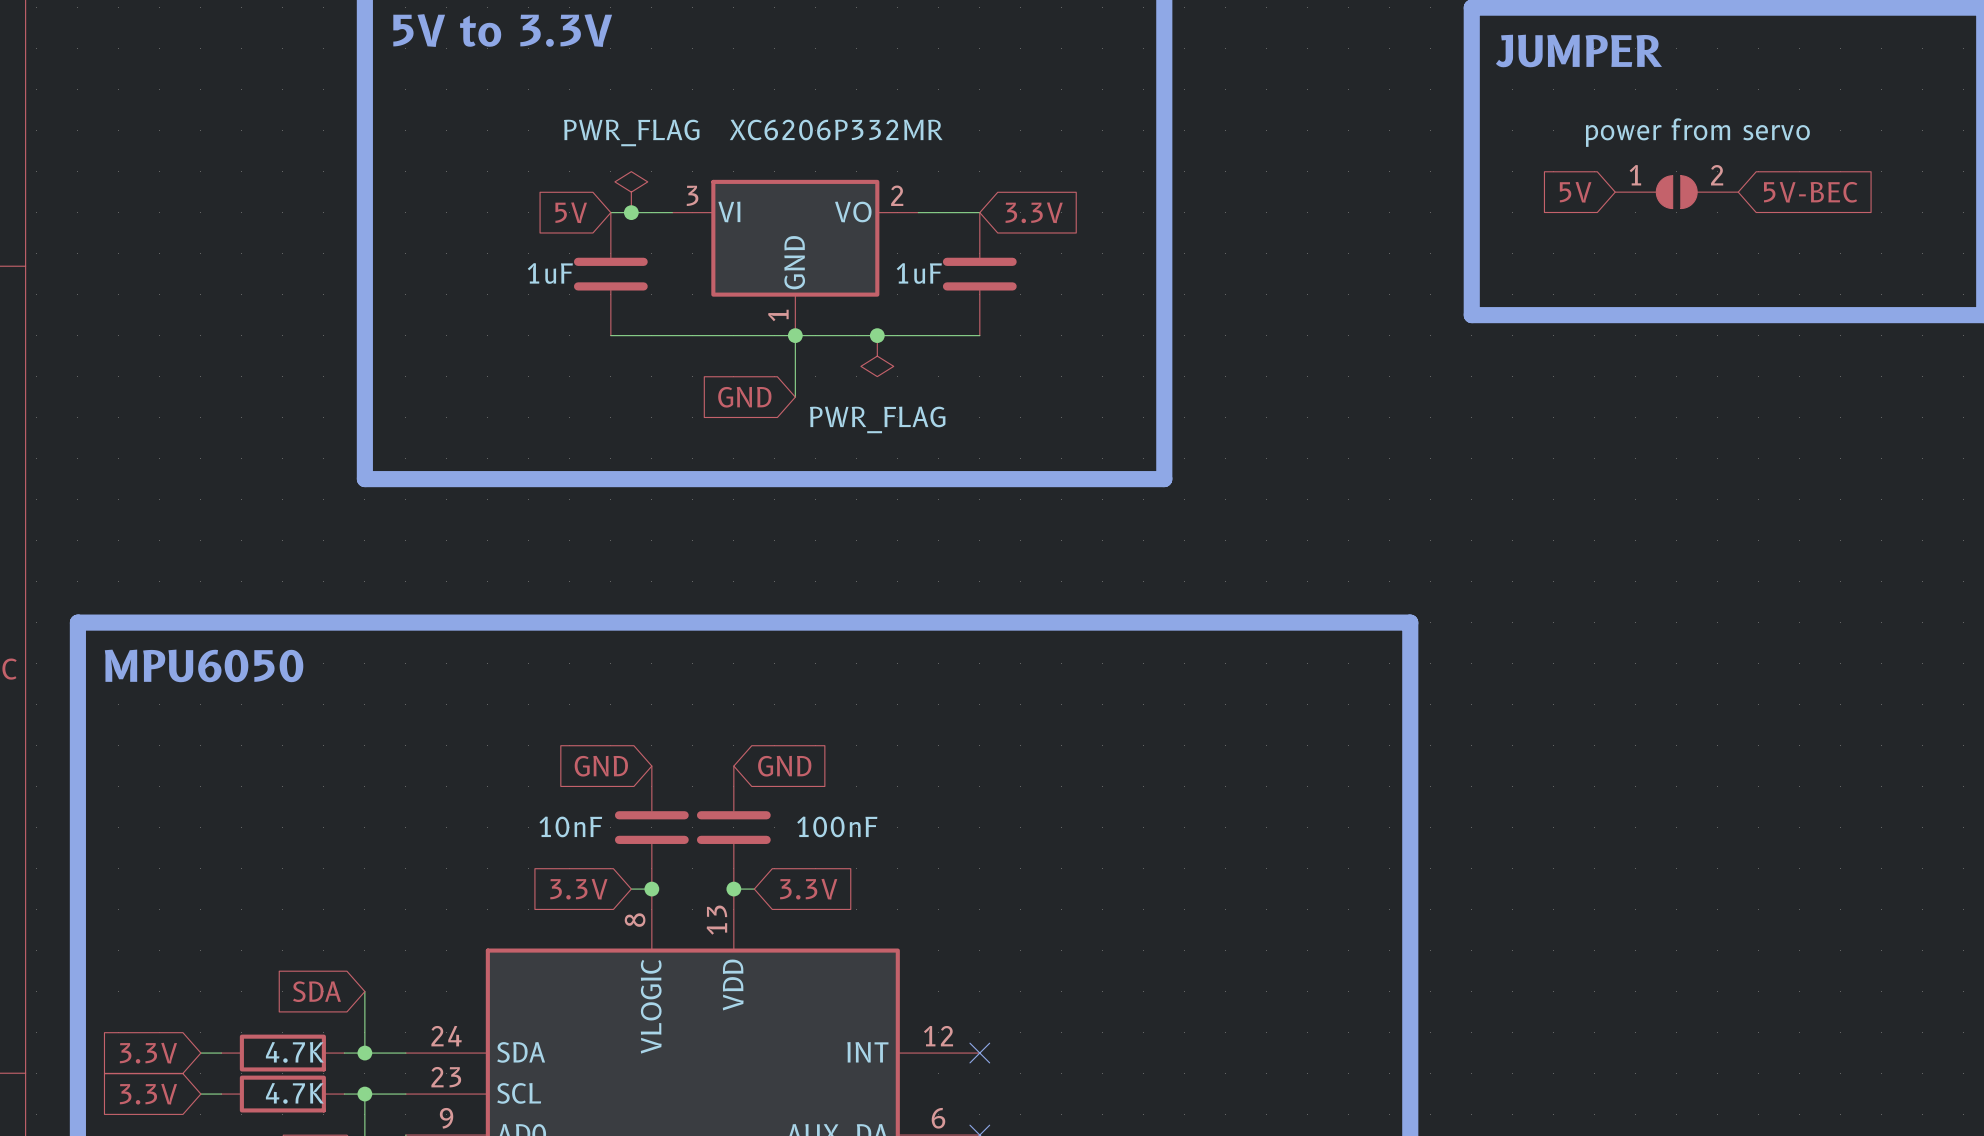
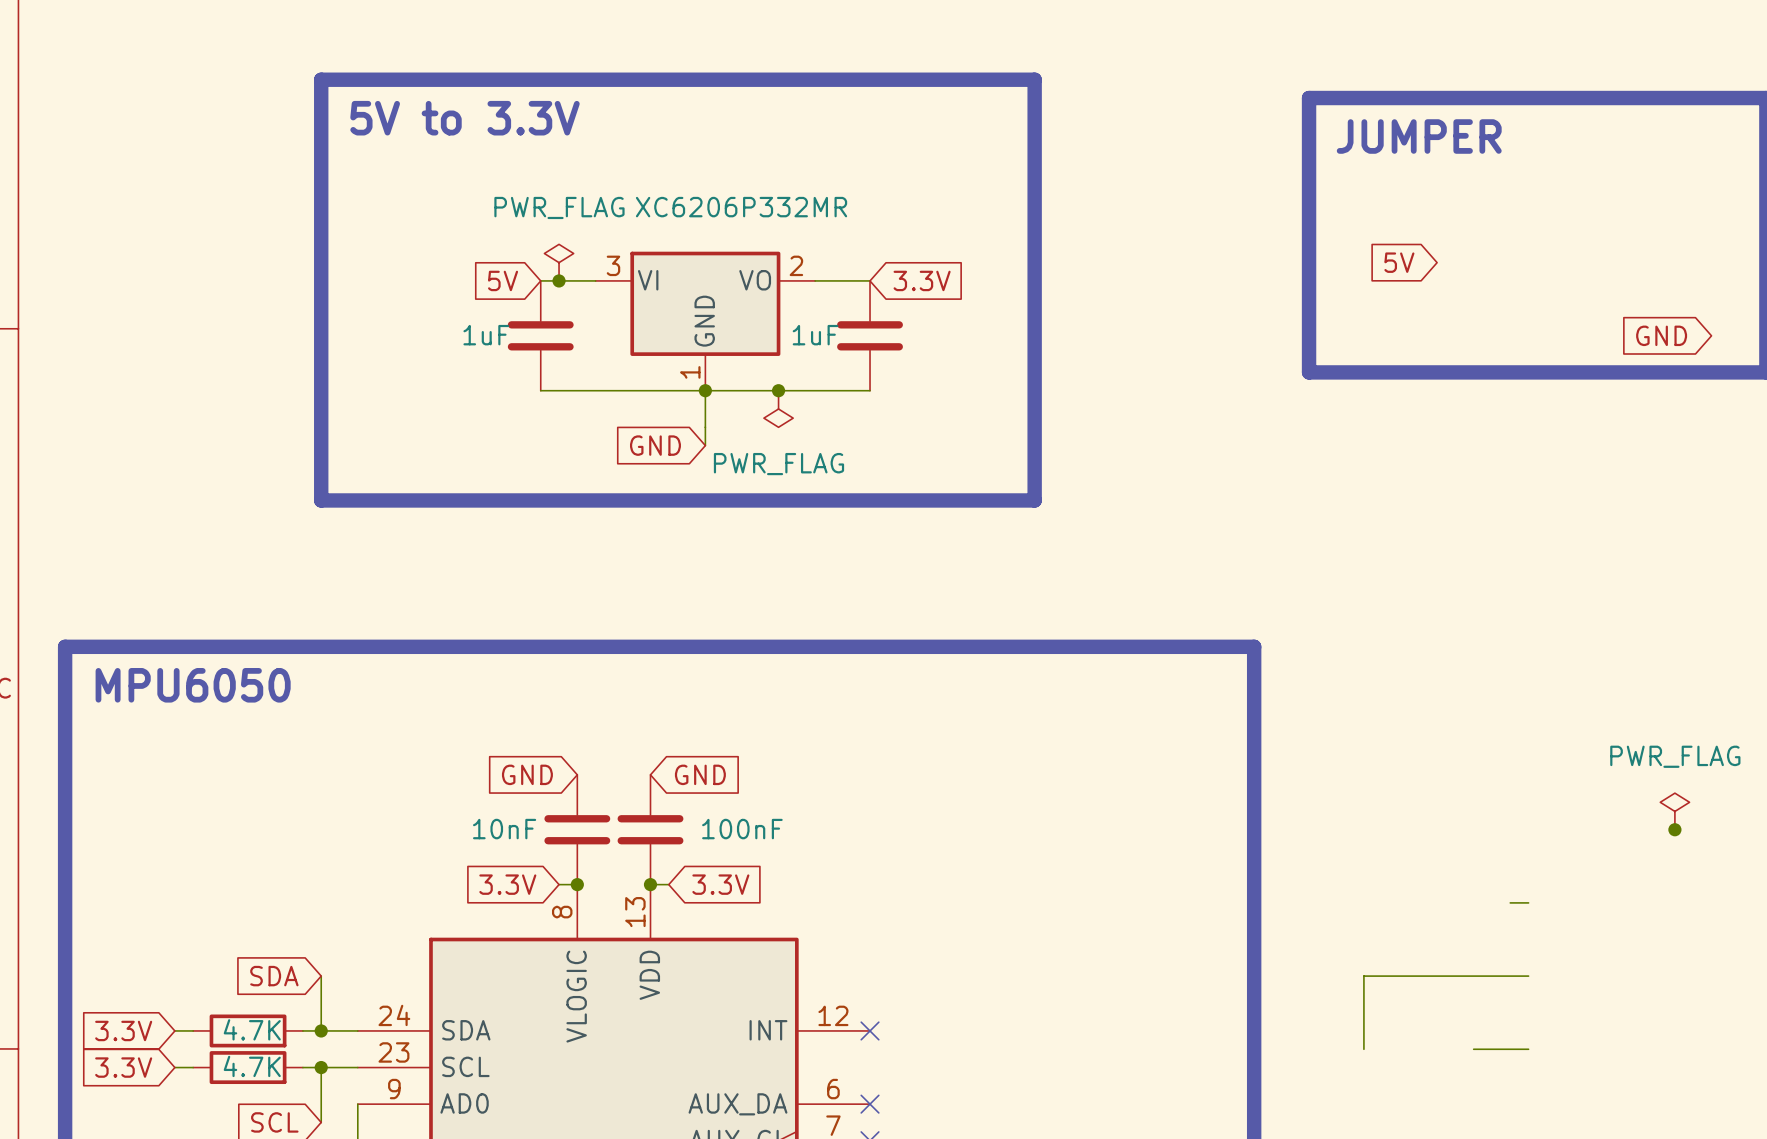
part: power from servo (1676, 192) -> none
global label: 5V-BEC (1810, 192) -> none
global label: none -> GND (1661, 335)
line: (364, 458) (364, 479) (1164, 479) (1164, 458) -> (321, 500) (1034, 500)
power symbol: none -> PWR_FLAG (1674, 811)
junction: none -> (1674, 829)
wire: none -> (1510, 902) (1528, 902)
wire: none -> (1528, 976) (1363, 976) (1363, 1049)
wire: none -> (1473, 1049) (1528, 1049)

